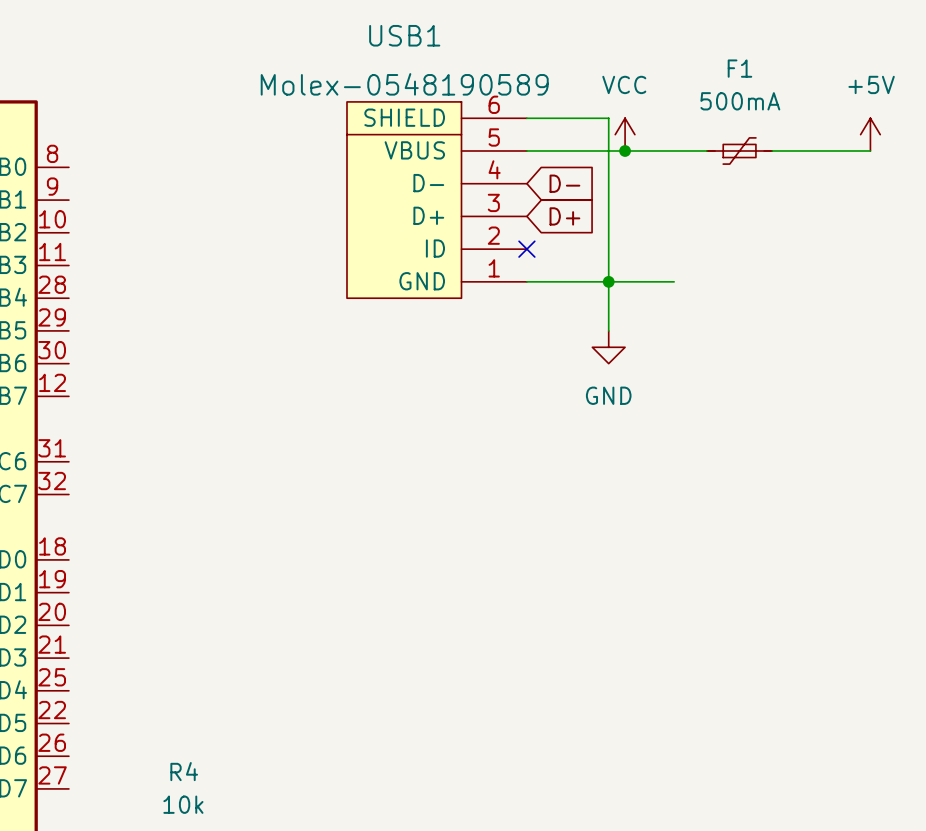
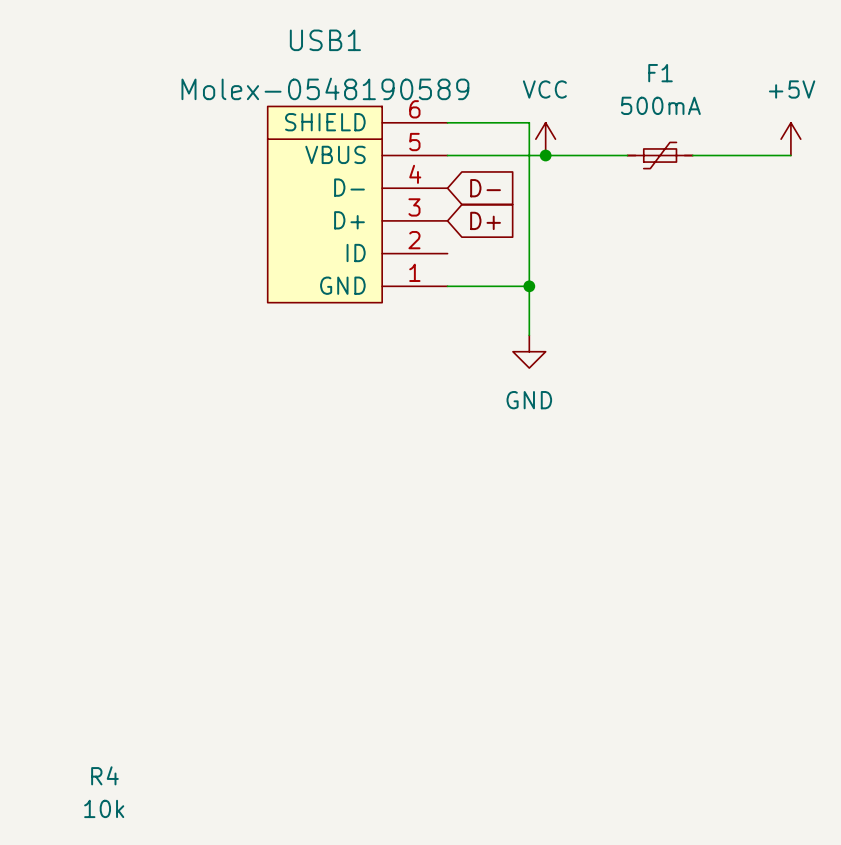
no-connect mark: (526, 249) -> none
wire: (608, 281) (674, 281) -> none

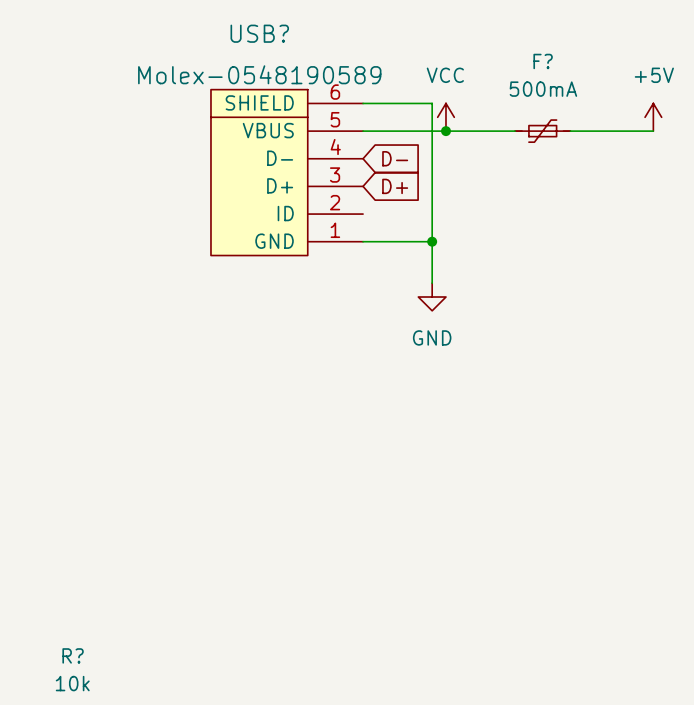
USB1 name: USB1 (325, 40) -> USB? (259, 33)
F1 name: F1 (660, 73) -> F? (543, 61)
R4 name: R4 (104, 775) -> R? (73, 655)

